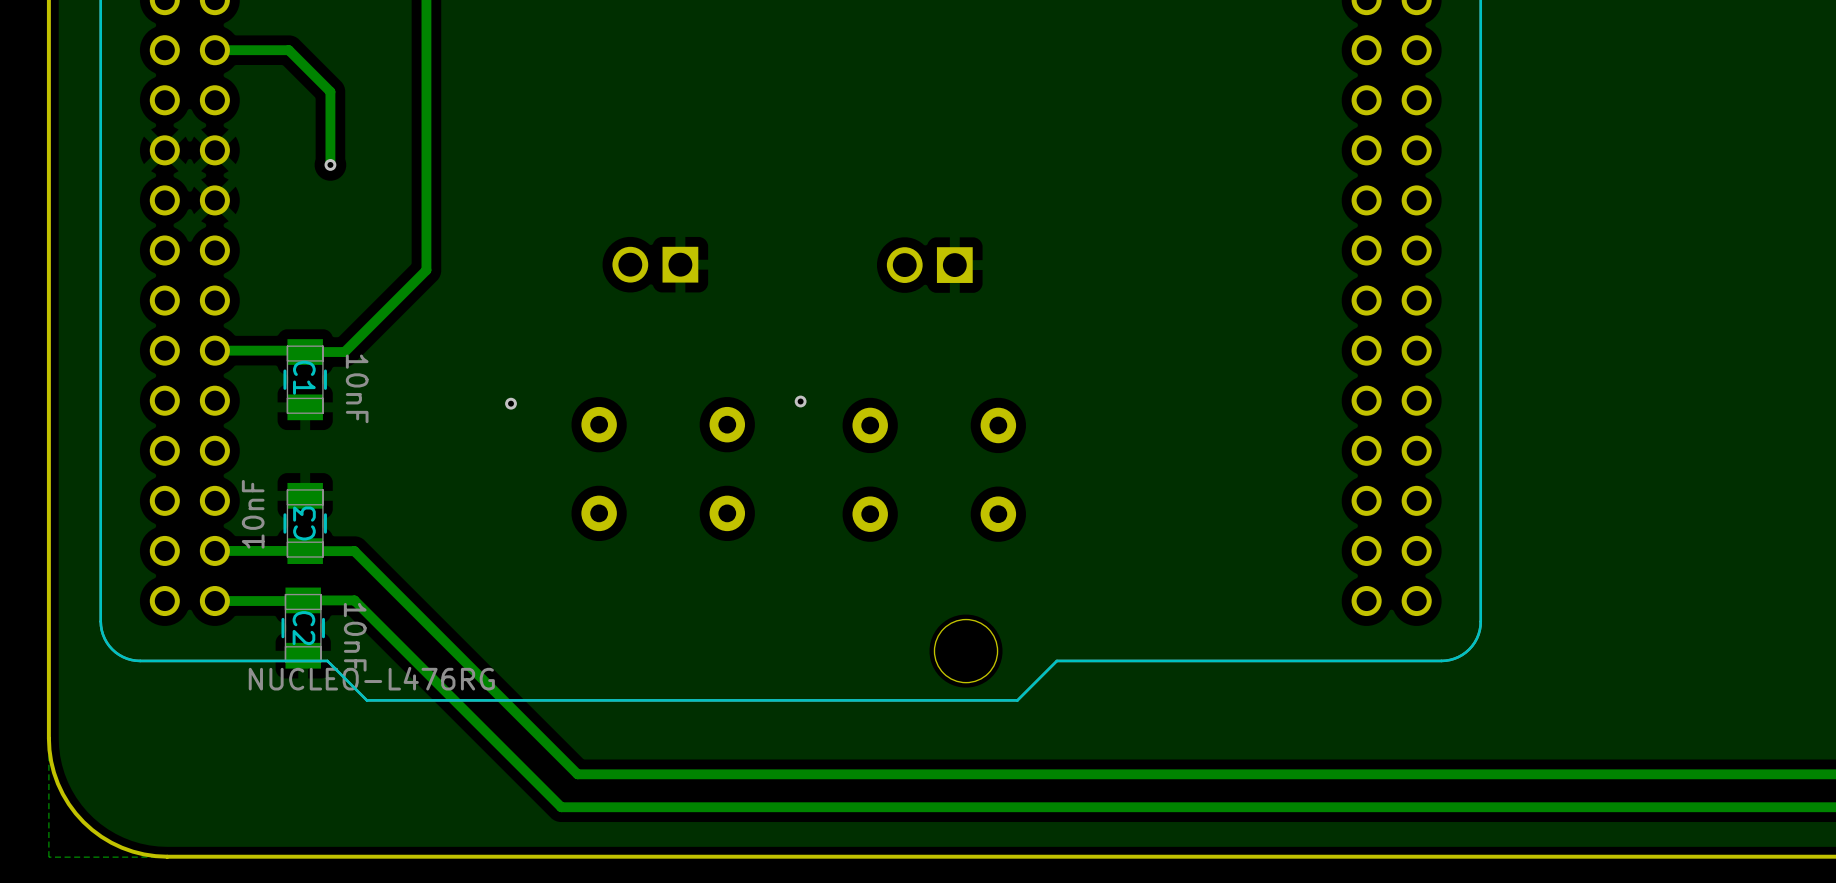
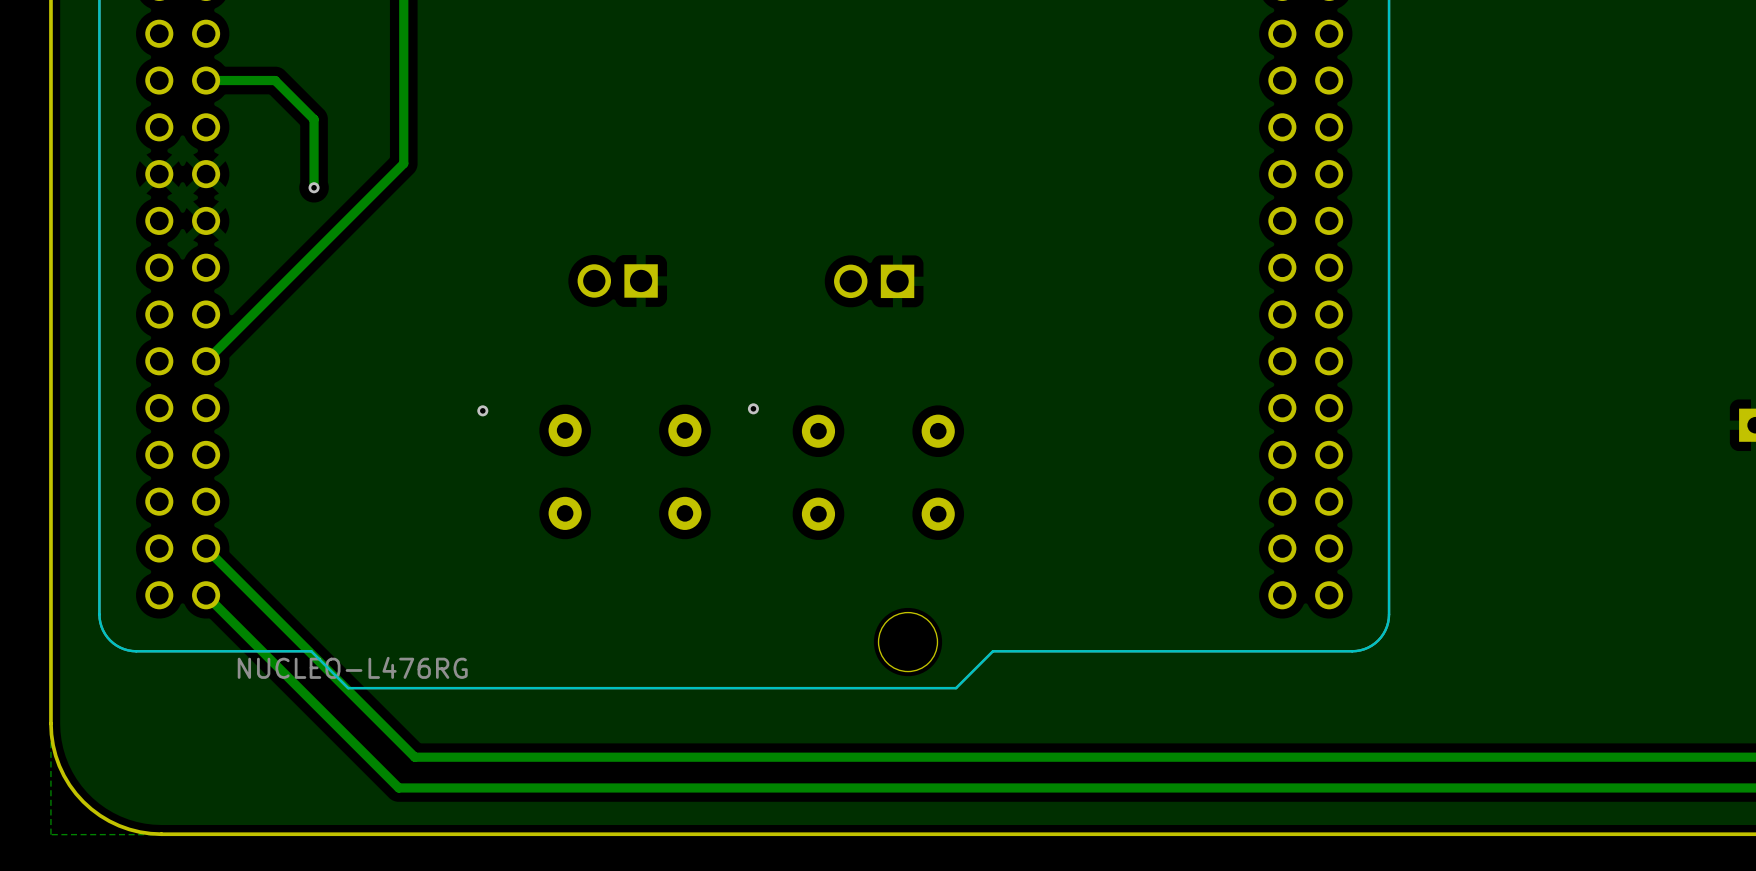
track: (426, 139) (426, 270) (344, 352) (305, 352) -> (403, 163) (206, 361)
track: (303, 350) (214, 350) -> none
C1: 10nF (305, 379) -> none
C3: 10nF (305, 523) -> none
track: (304, 550) (214, 550) -> none
track: (305, 551) (354, 551) (577, 774) -> (206, 548) (414, 757) (545, 757)
track: (214, 601) (354, 600) (561, 807) -> (206, 595) (398, 787) (529, 787)
C2: 10nF (303, 628) -> none

